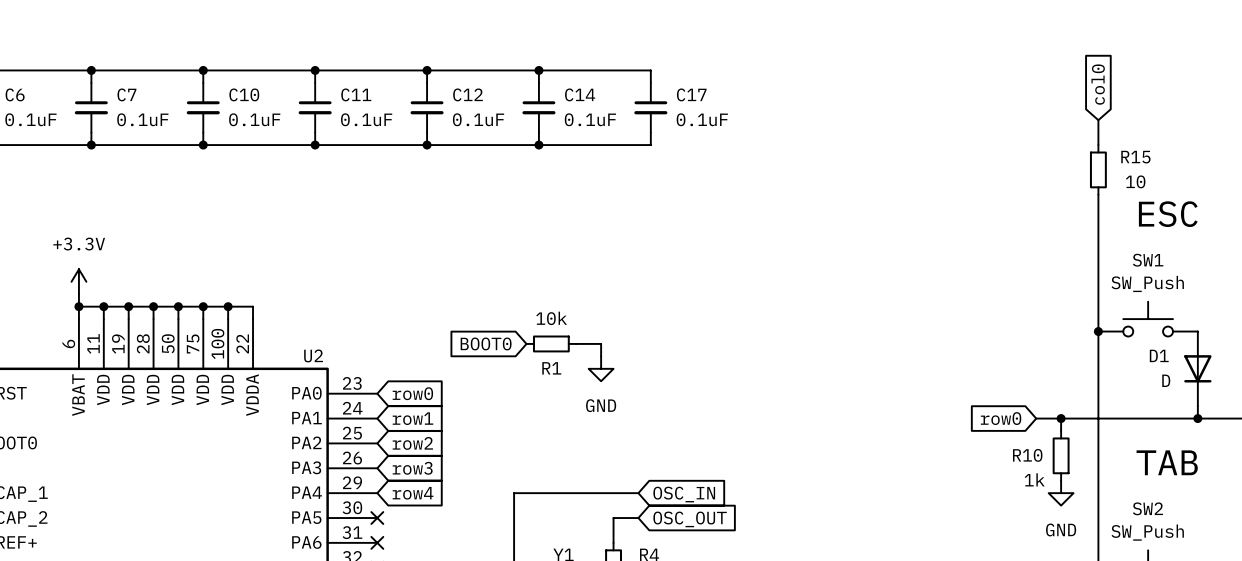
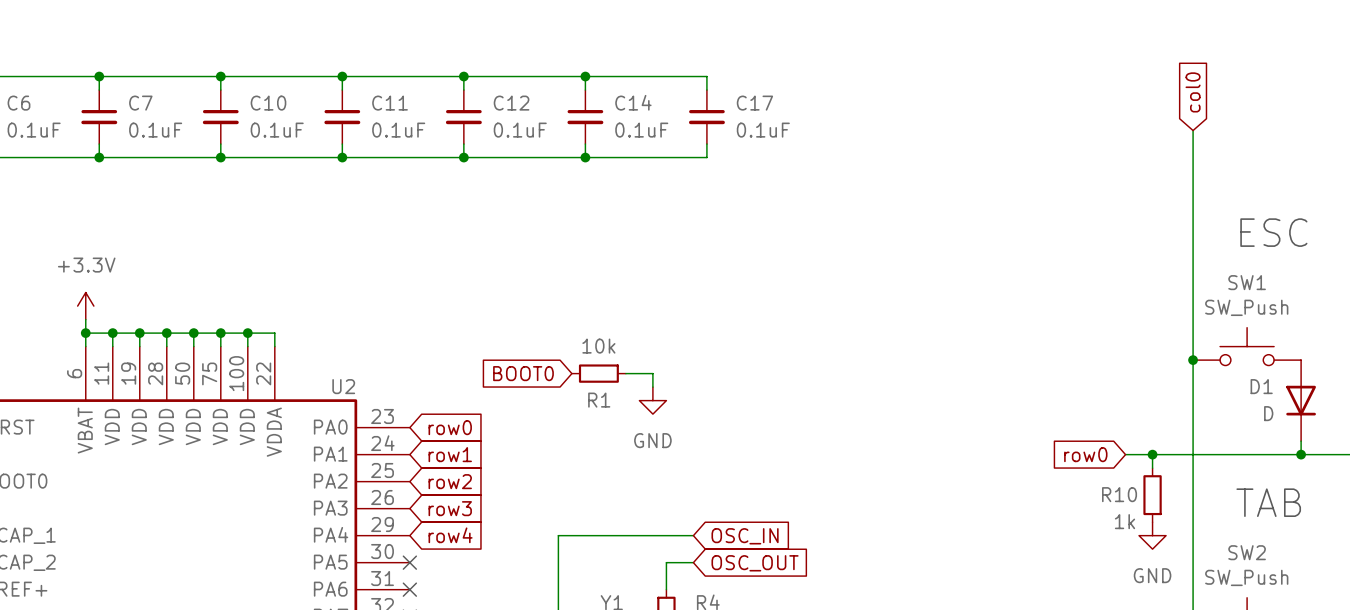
wire: none -> (1193, 157) (1193, 211)
R15: 10 (1098, 169) -> none

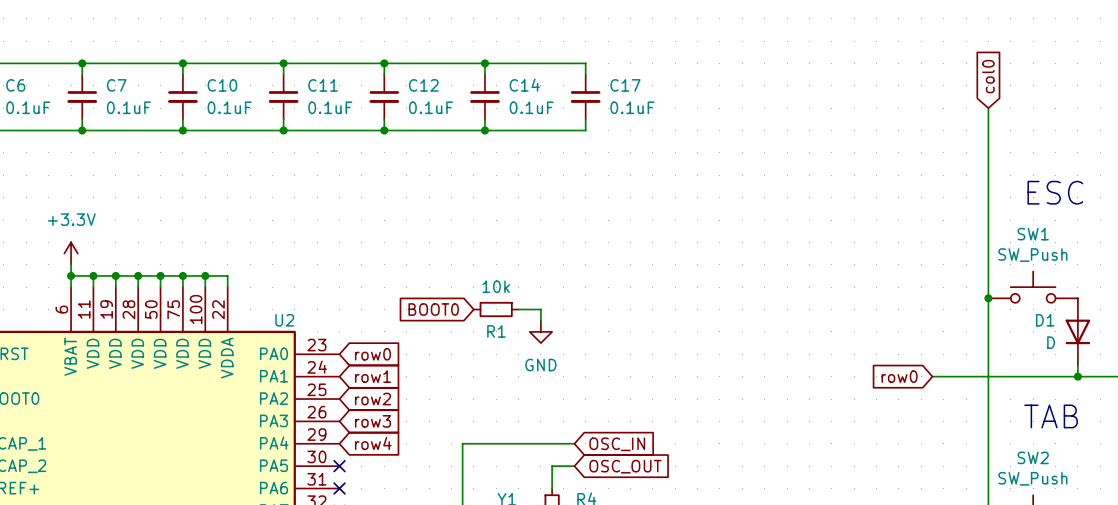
wire: (1152, 454) (1152, 468) -> none
junction: (1152, 454) -> none
R10: 1k (1152, 495) -> none
power symbol: GND (1152, 535) -> none

